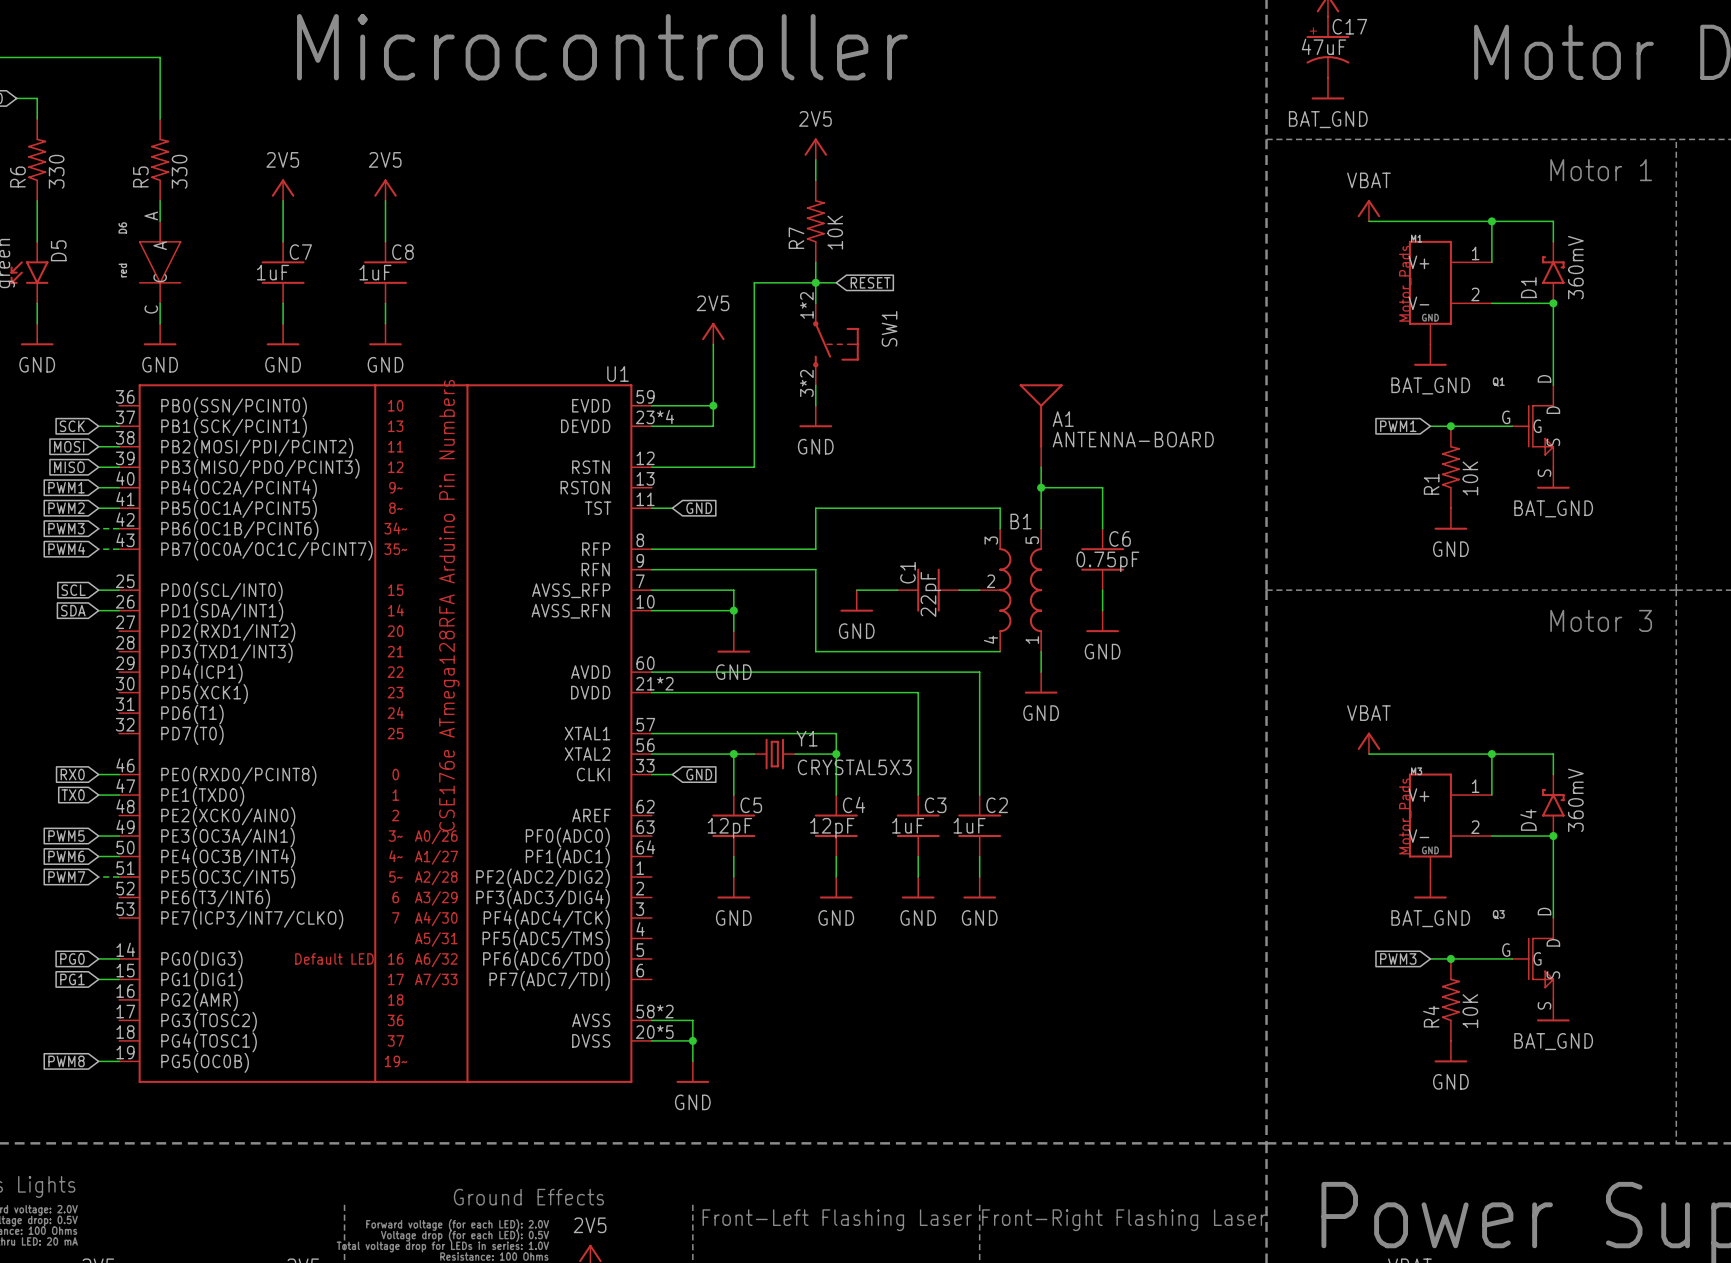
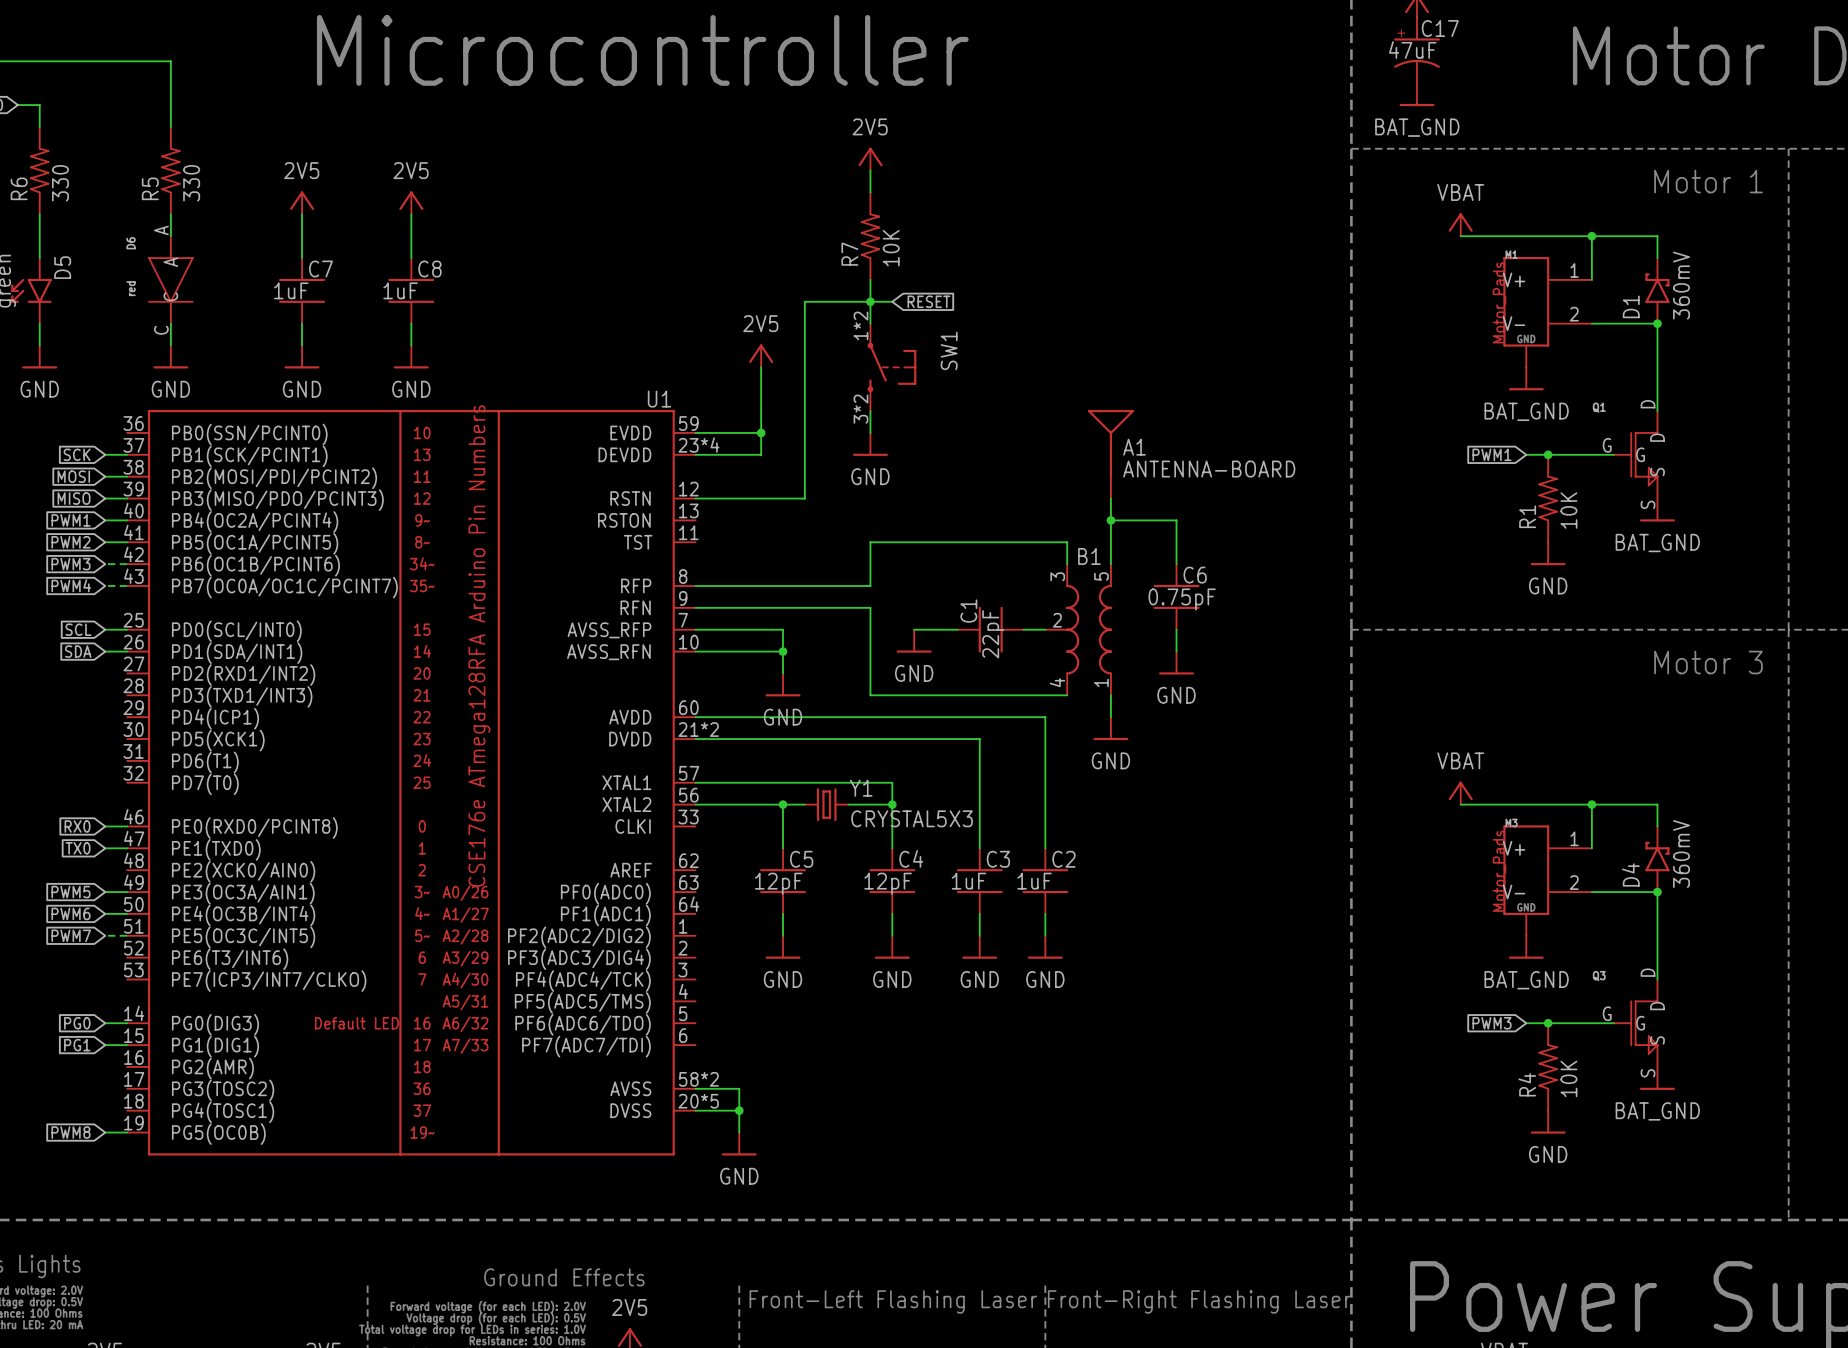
wire: (651, 508) (672, 508) -> none
global label: GND (699, 508) -> none
wire: (651, 774) (672, 774) -> none
global label: GND (699, 774) -> none

